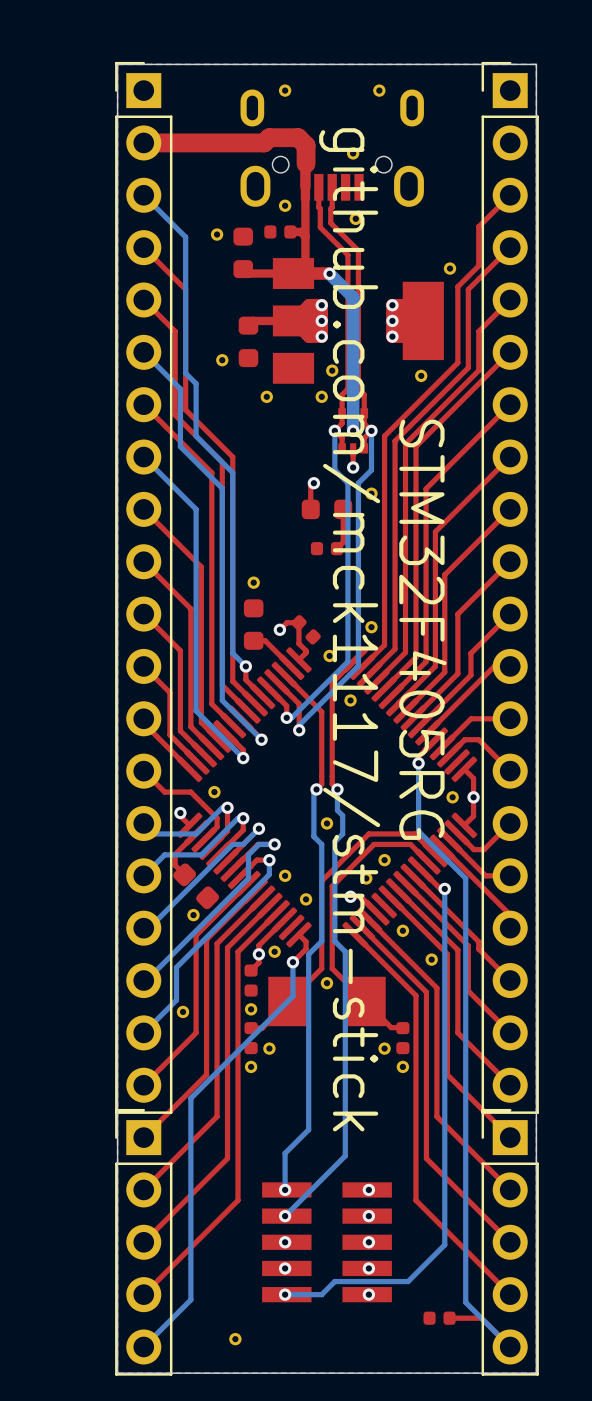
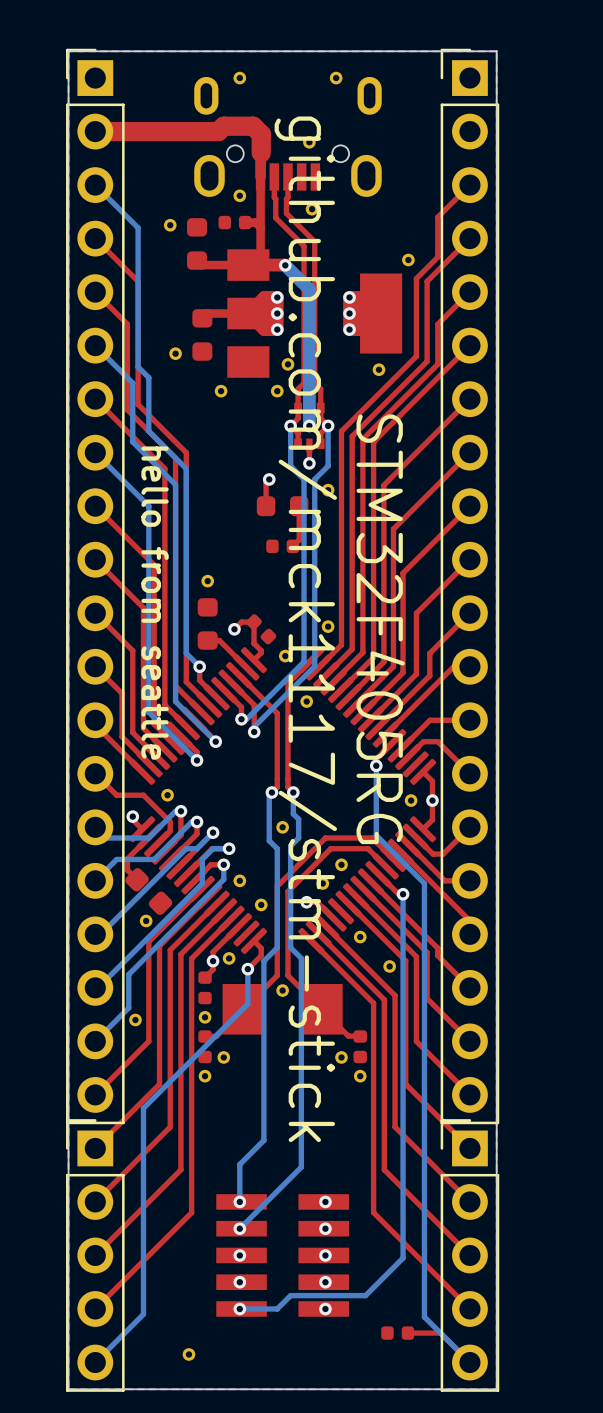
text: none -> hello from seattle (155, 603)

